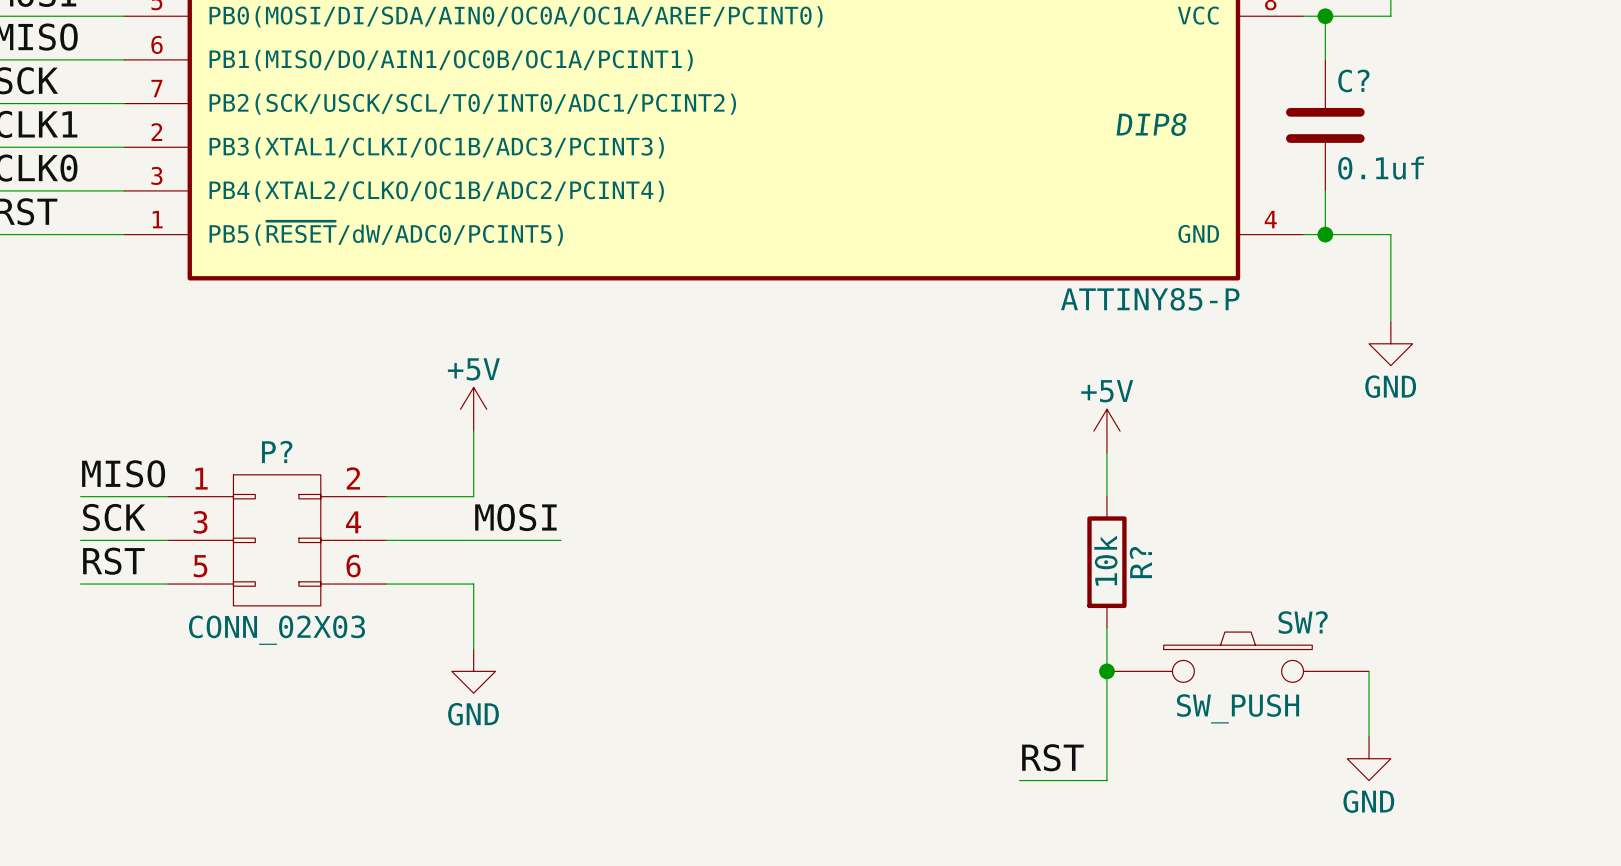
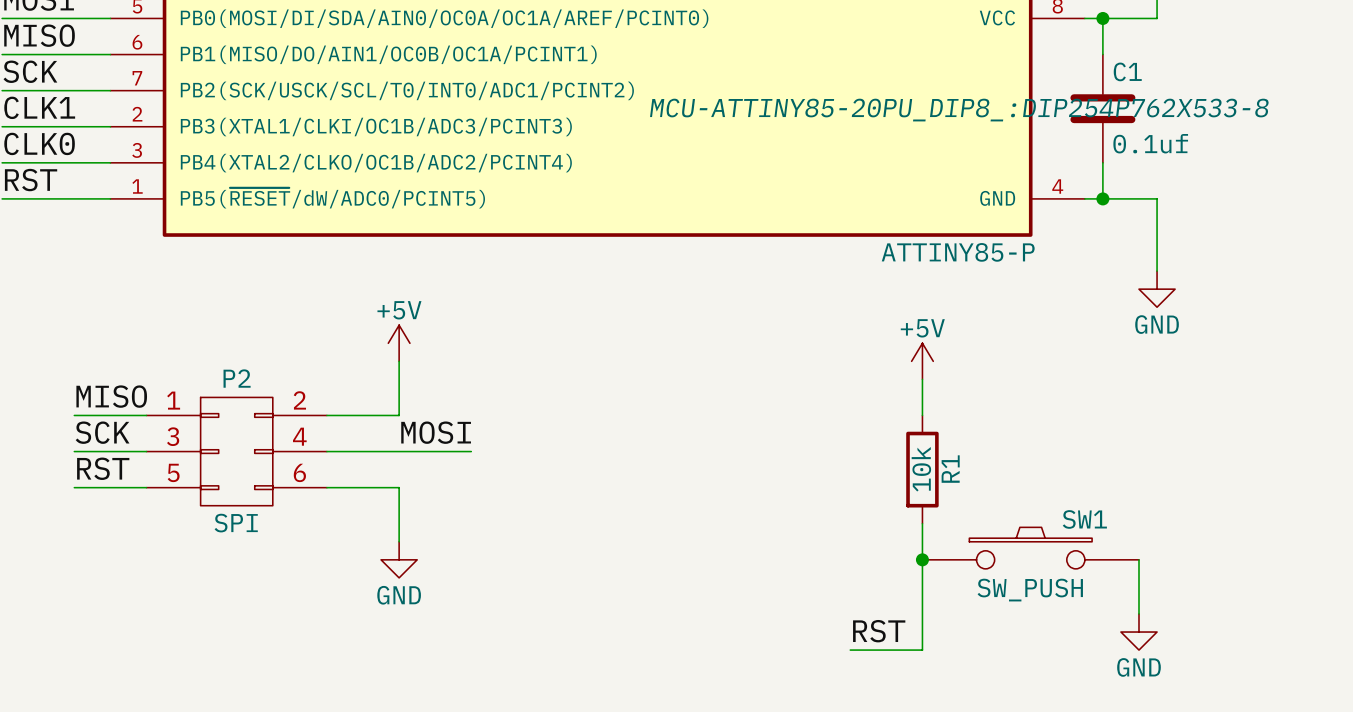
C? name: C? (1353, 80) -> C1 (1127, 71)
part text: DIP8 (1151, 124) -> MCU-ATTINY85-20PU_DIP8_:DIP254P762X533-8 (959, 110)
P? name: P? (277, 451) -> P2 (237, 378)
R? name: R? (1140, 562) -> R1 (950, 469)
SW? name: SW? (1303, 622) -> SW1 (1084, 519)
P? value: CONN_02X03 (277, 630) -> SPI (236, 523)

